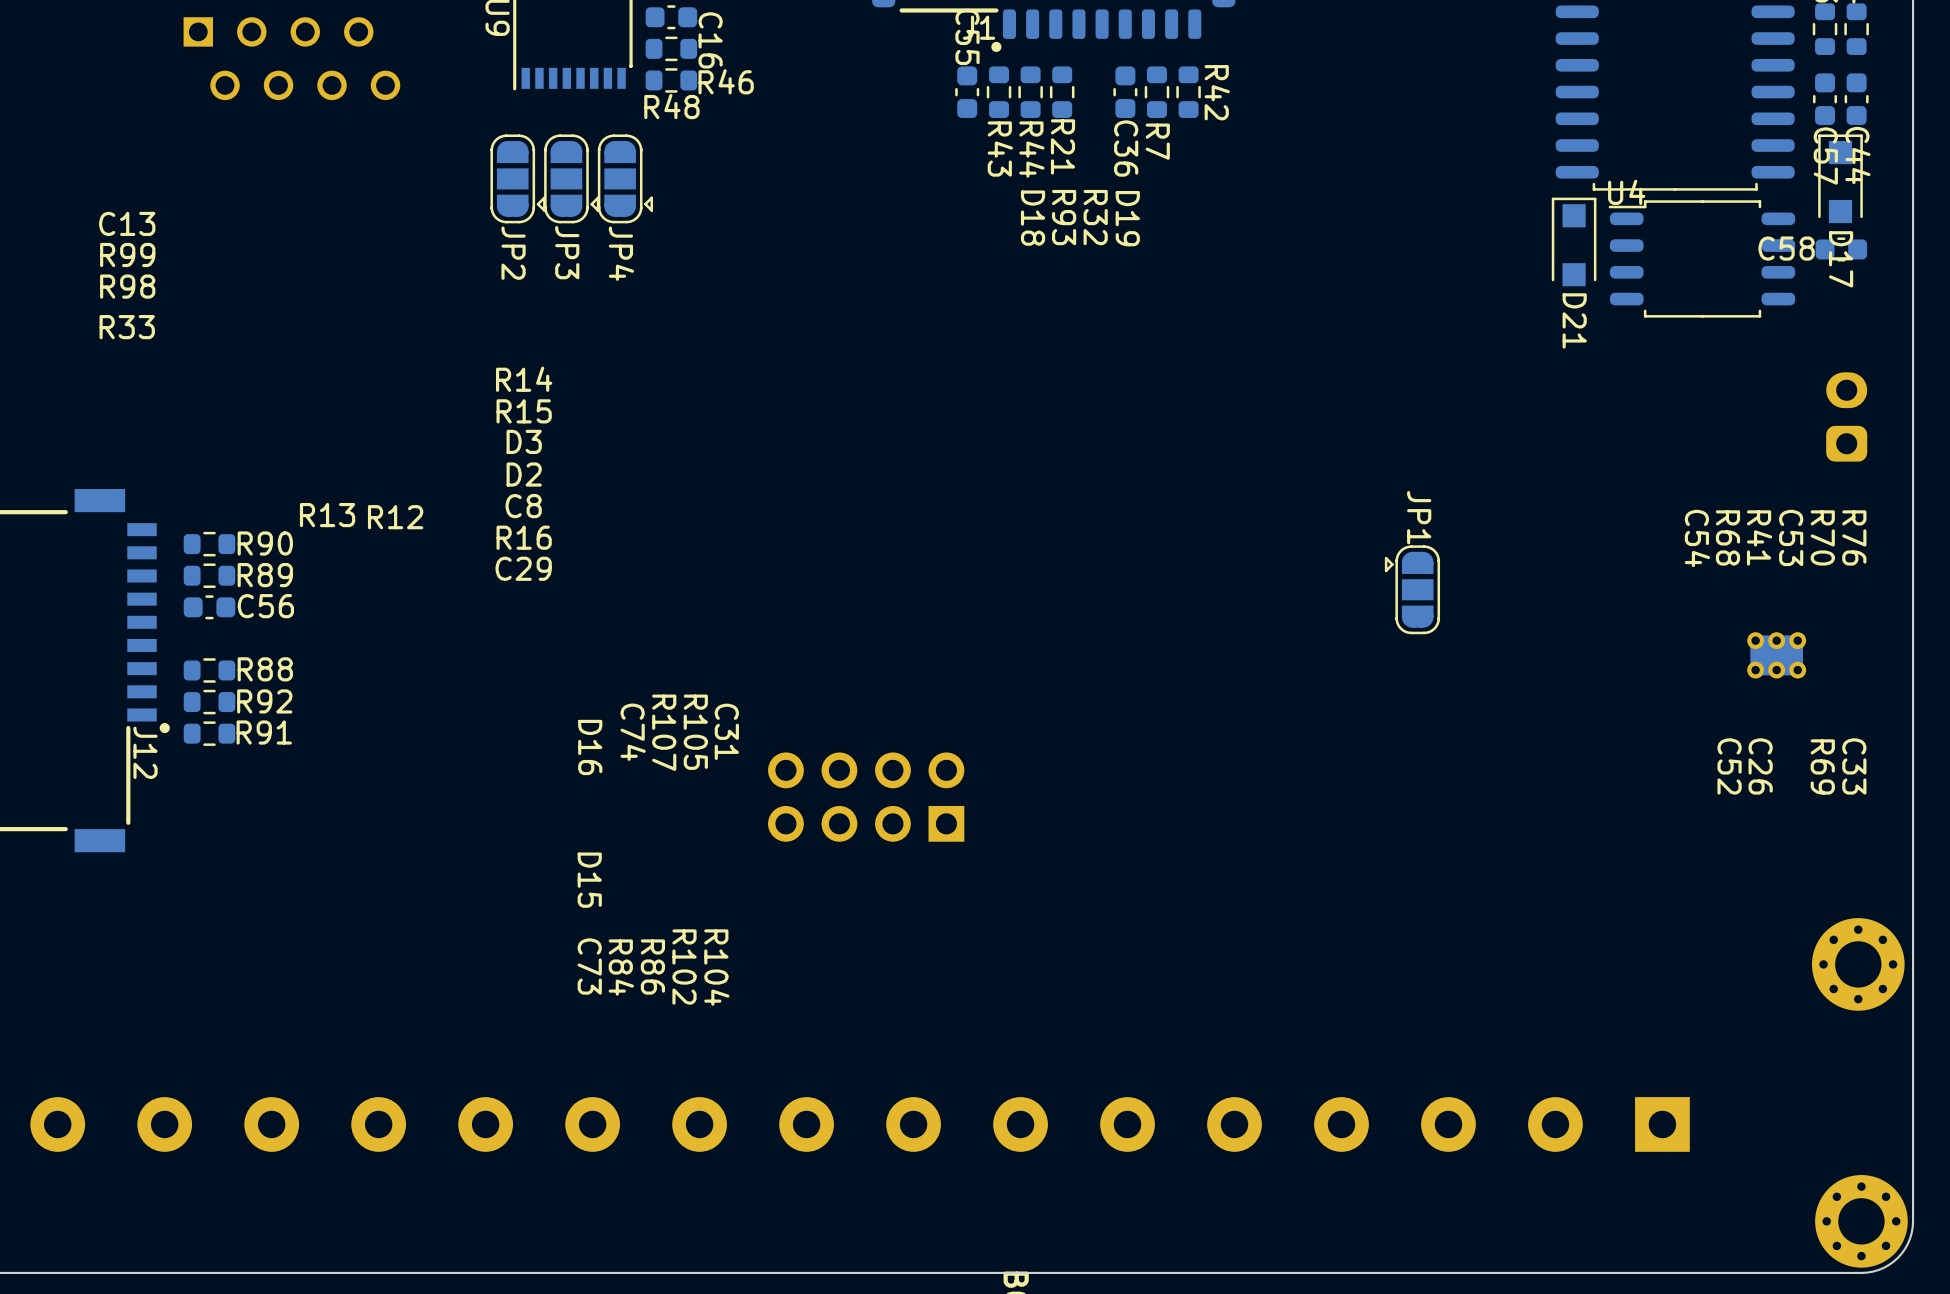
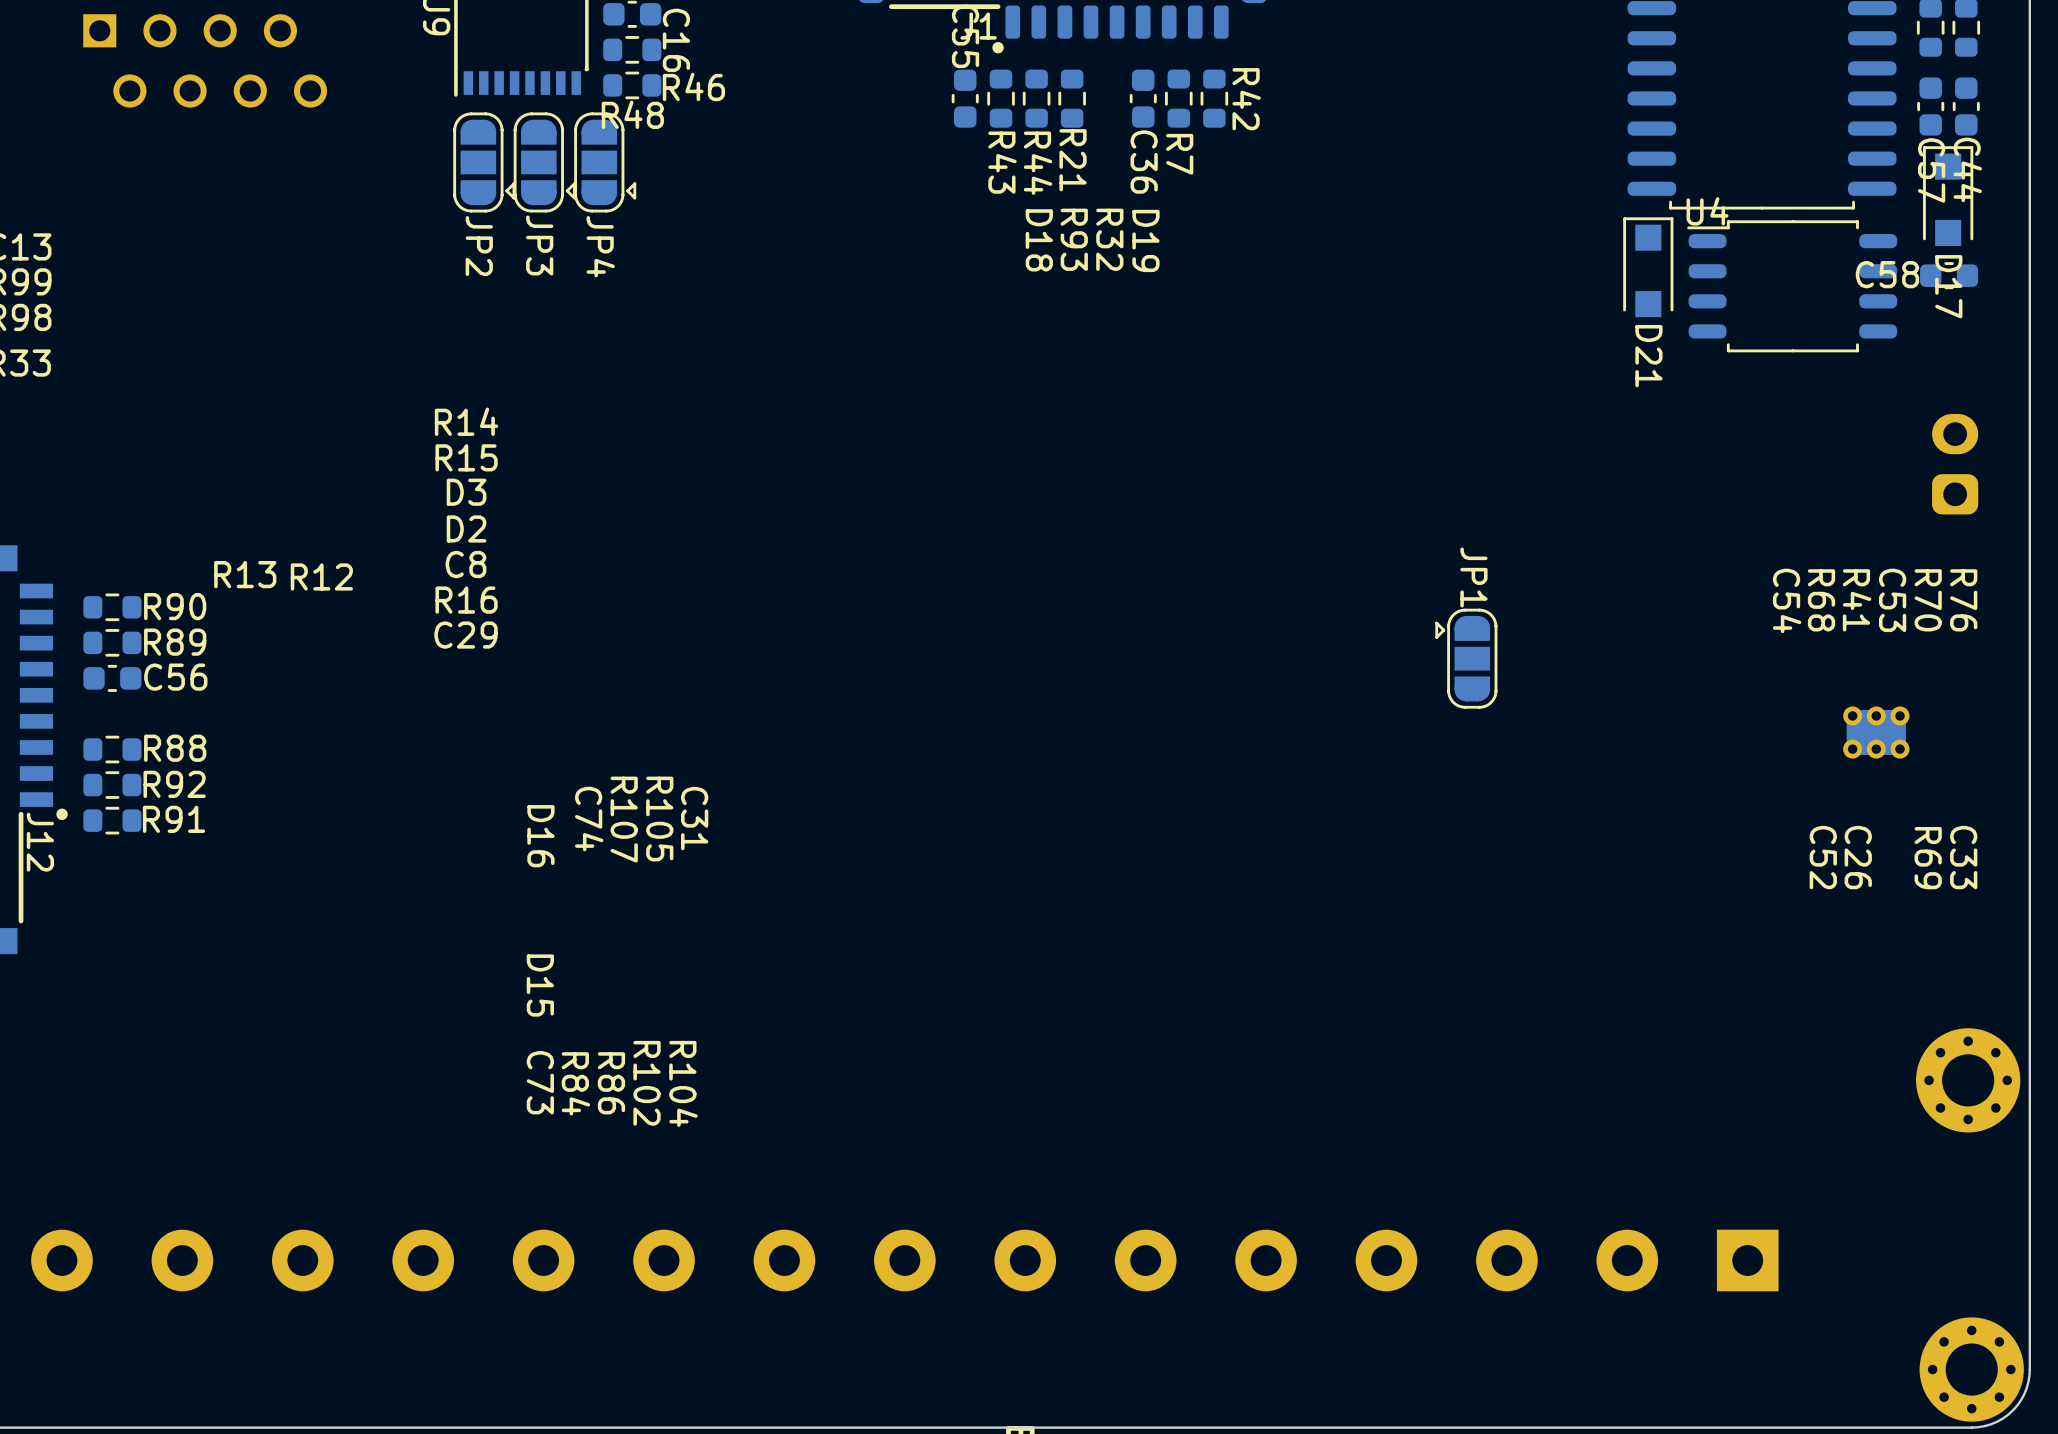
JP2 position: (518, 178) -> (484, 162)
JP3 position: (571, 178) -> (544, 162)
JP4 position: (625, 178) -> (605, 162)
part: (866, 797) -> none

